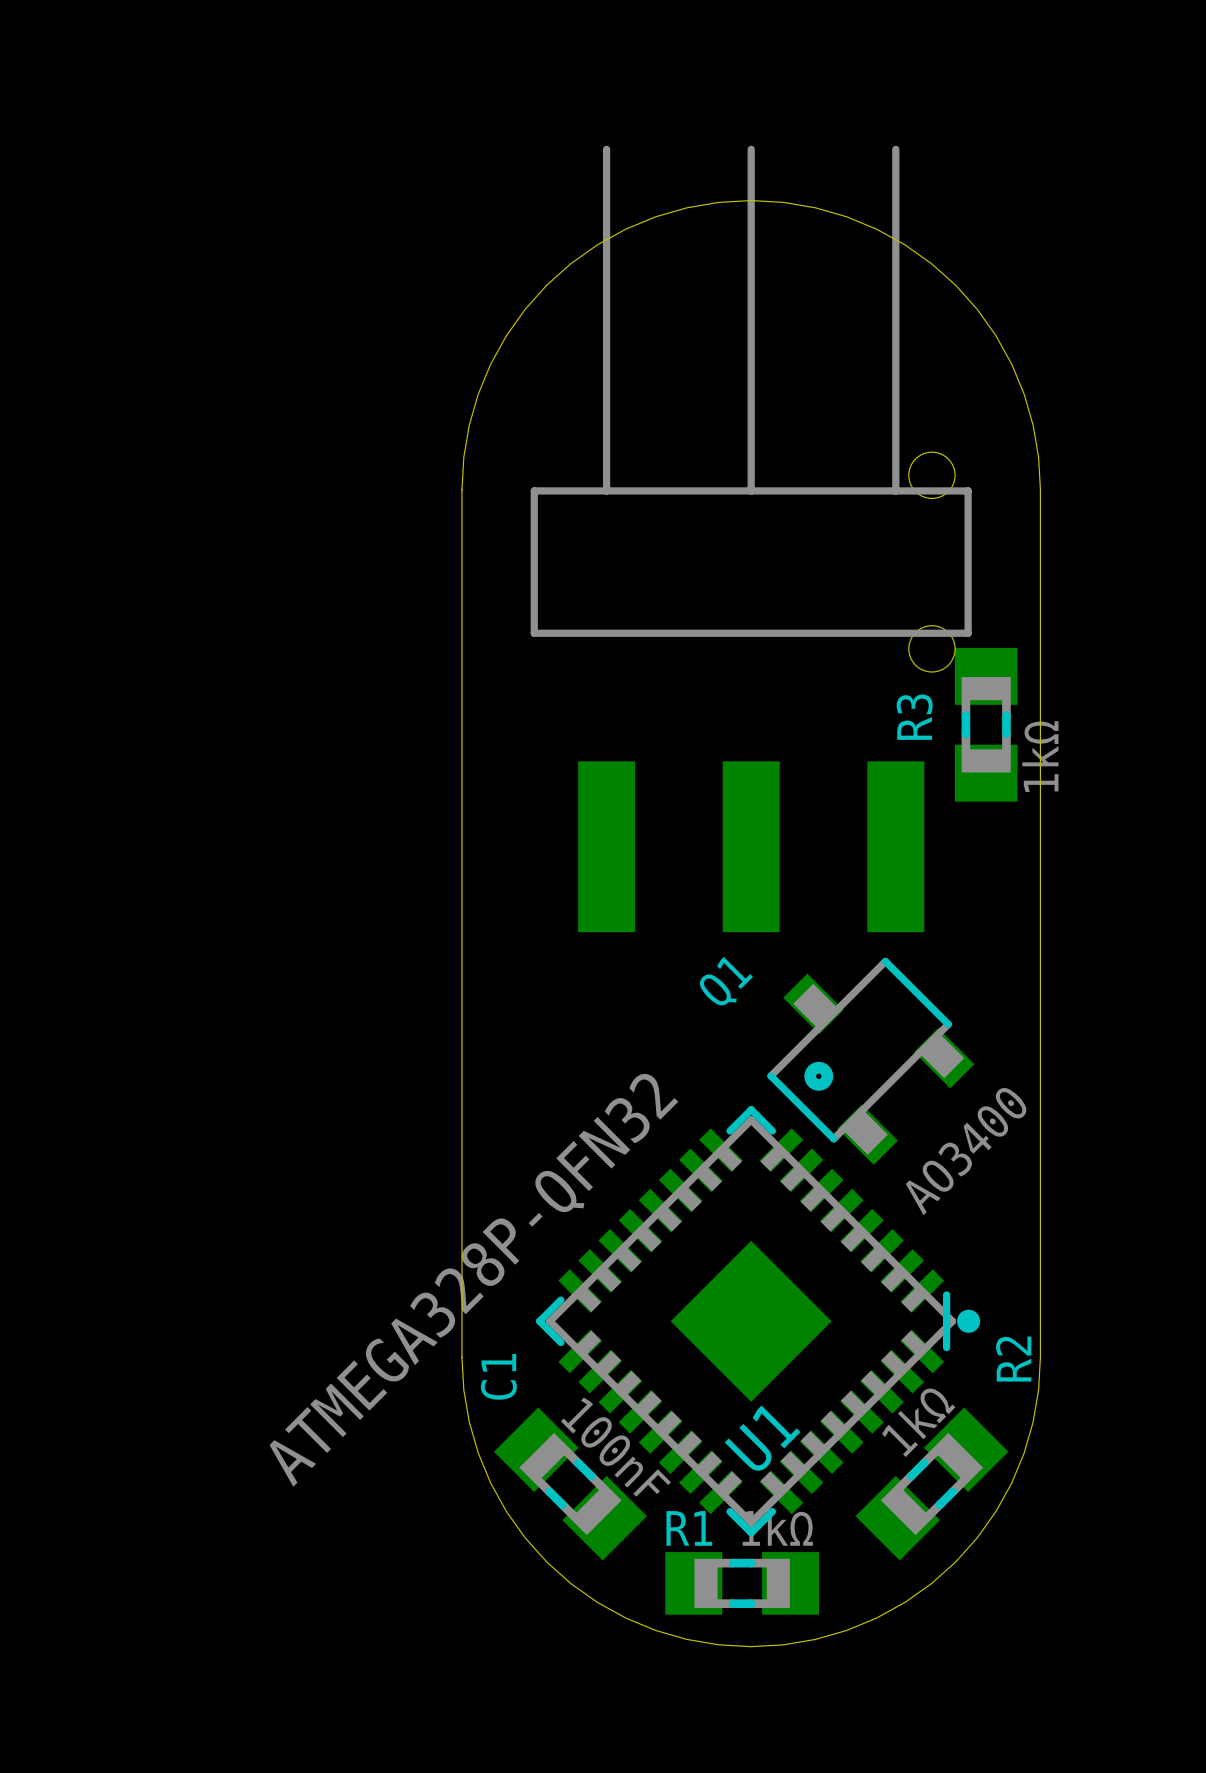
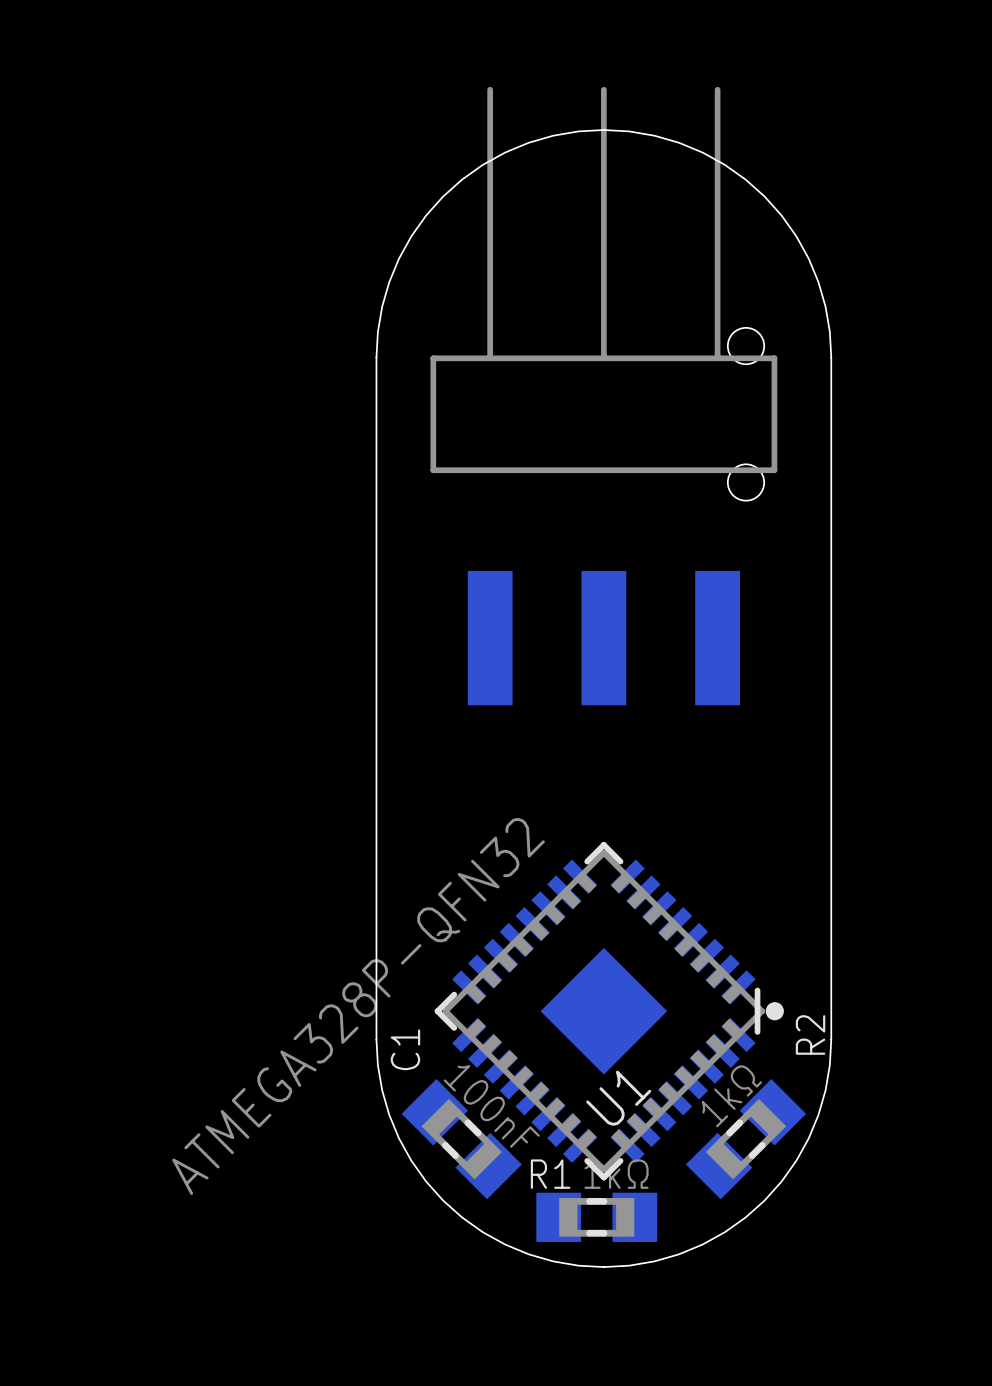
R3: 1kΩ (986, 724) -> none
Q1: AO3400 (870, 1061) -> none

